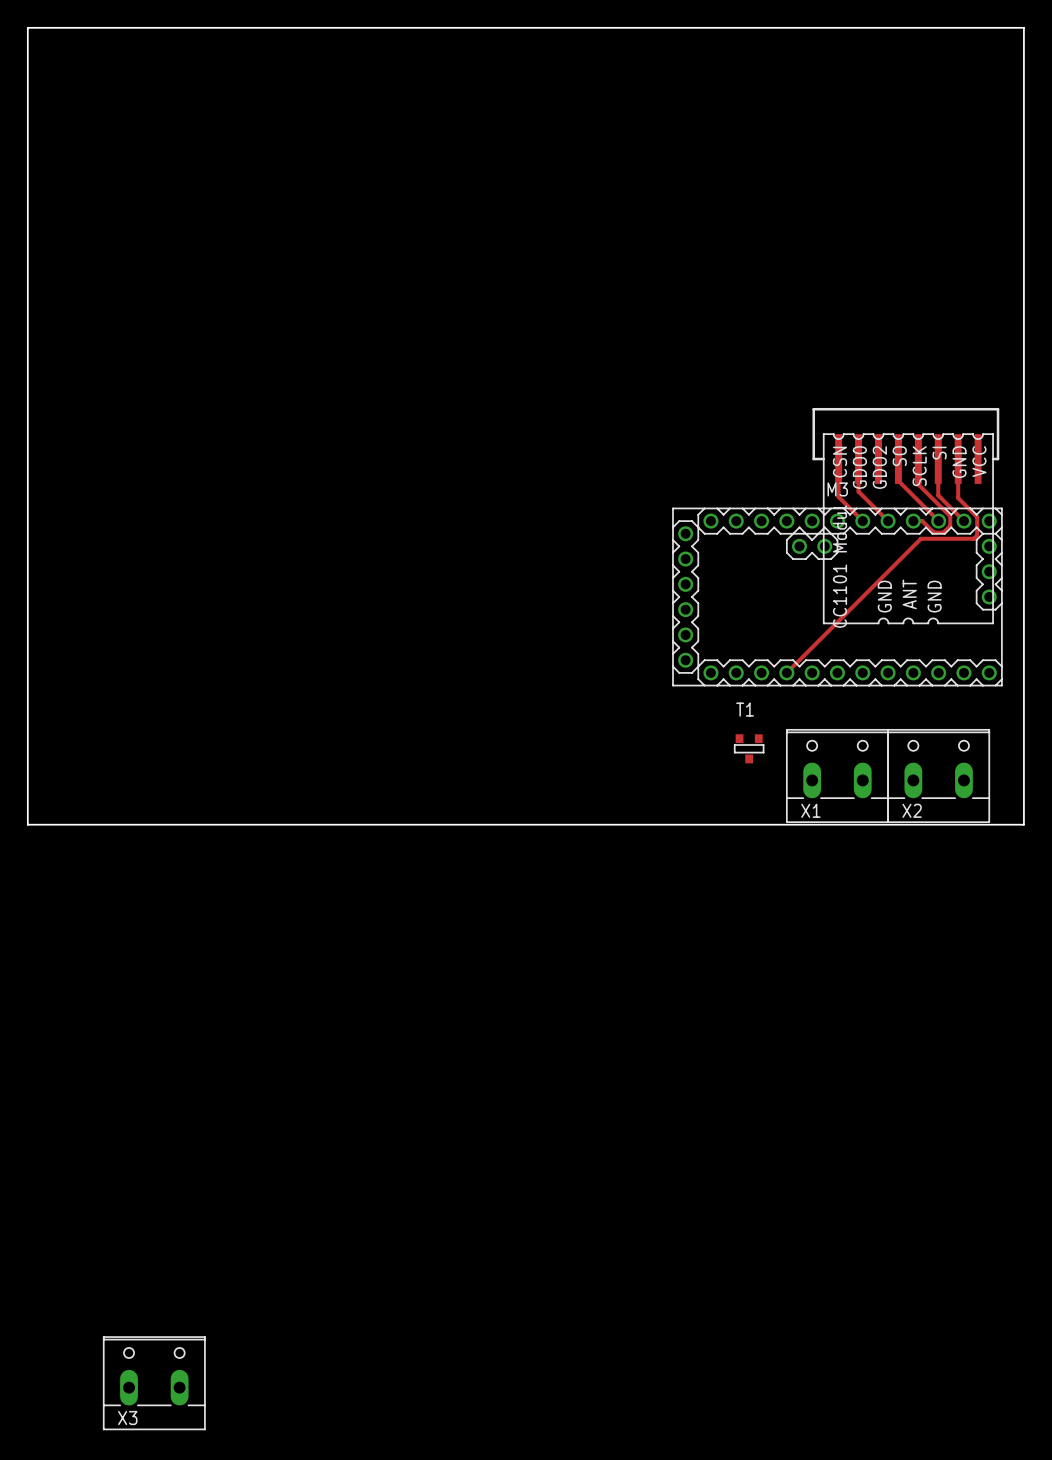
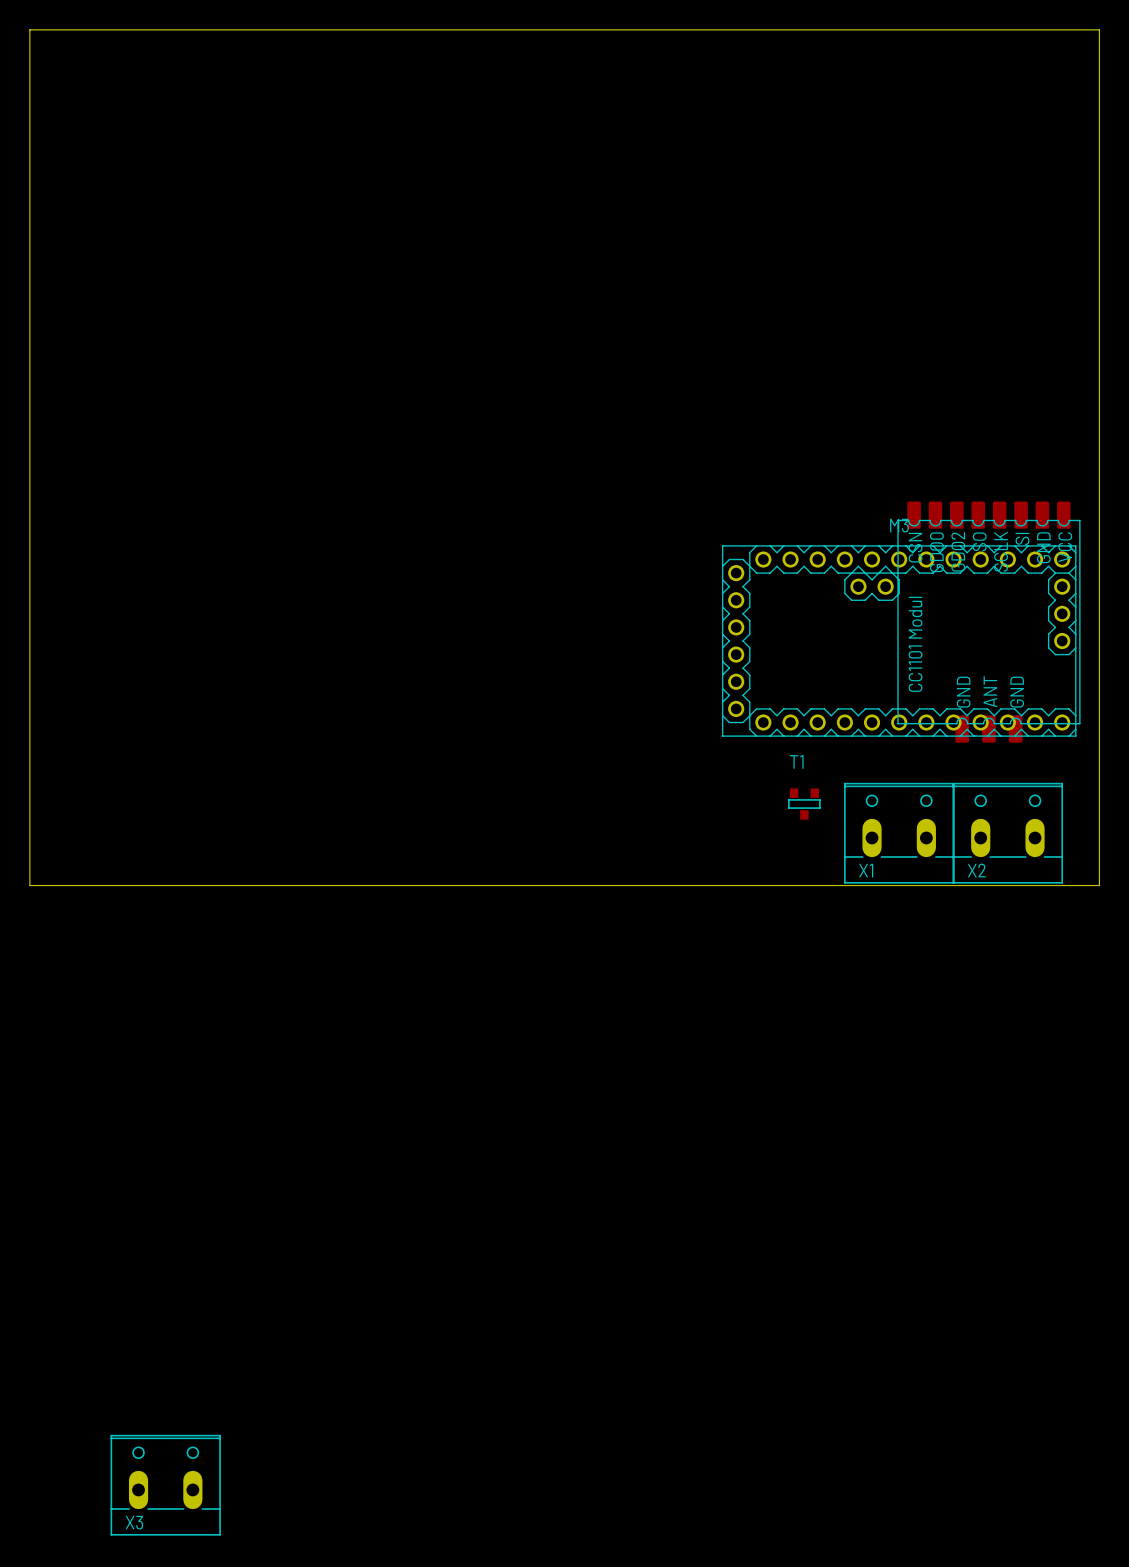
track: (838, 459) (838, 496) (862, 521) -> none
track: (858, 459) (858, 491) (888, 521) -> none
track: (898, 459) (898, 480) (938, 521) -> none
track: (918, 459) (918, 484) (950, 516) (950, 525) (943, 532) (933, 532) (922, 521) (913, 521) -> none
track: (938, 459) (938, 495) (963, 521) -> none
track: (958, 459) (958, 498) (977, 517) (977, 535) (973, 538) (920, 538) (786, 672) -> none
part: (905, 515) -> none
part: none -> (988, 622)

